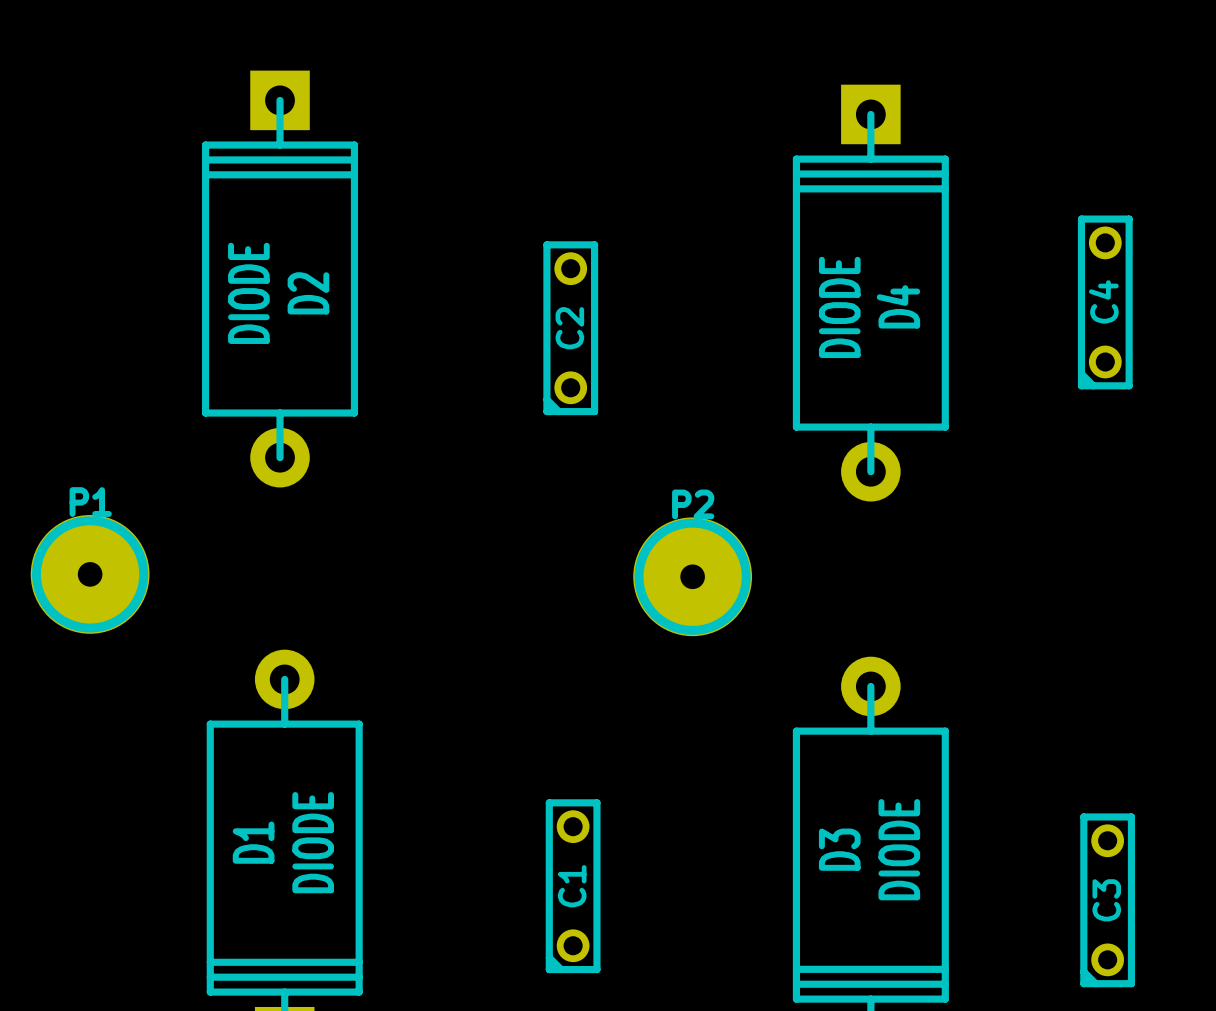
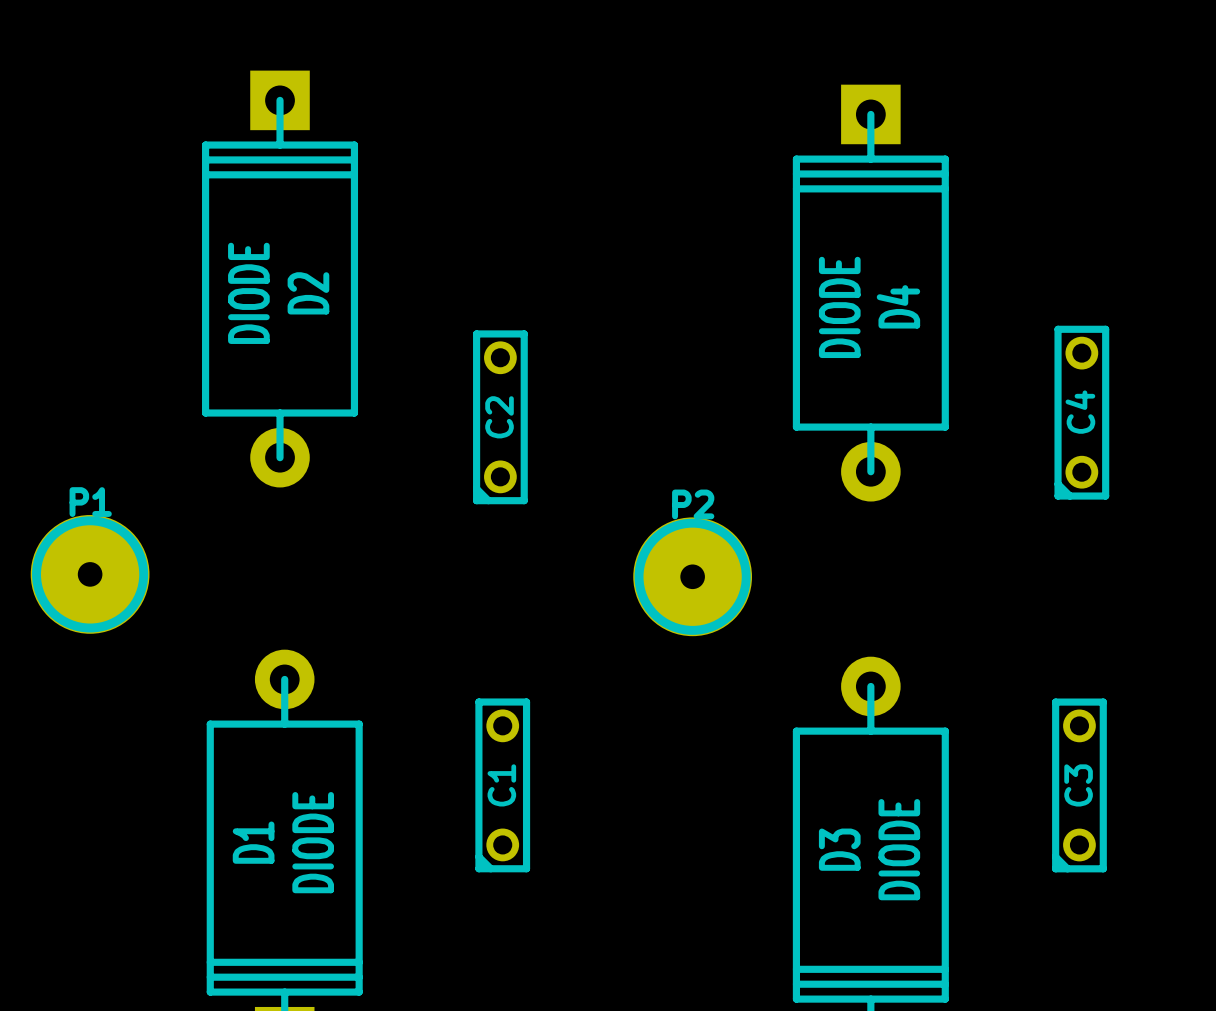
C4 position: (1105, 302) -> (1081, 412)
C2 position: (570, 328) -> (500, 417)
C1 position: (573, 886) -> (502, 785)
C3 position: (1107, 900) -> (1079, 785)

